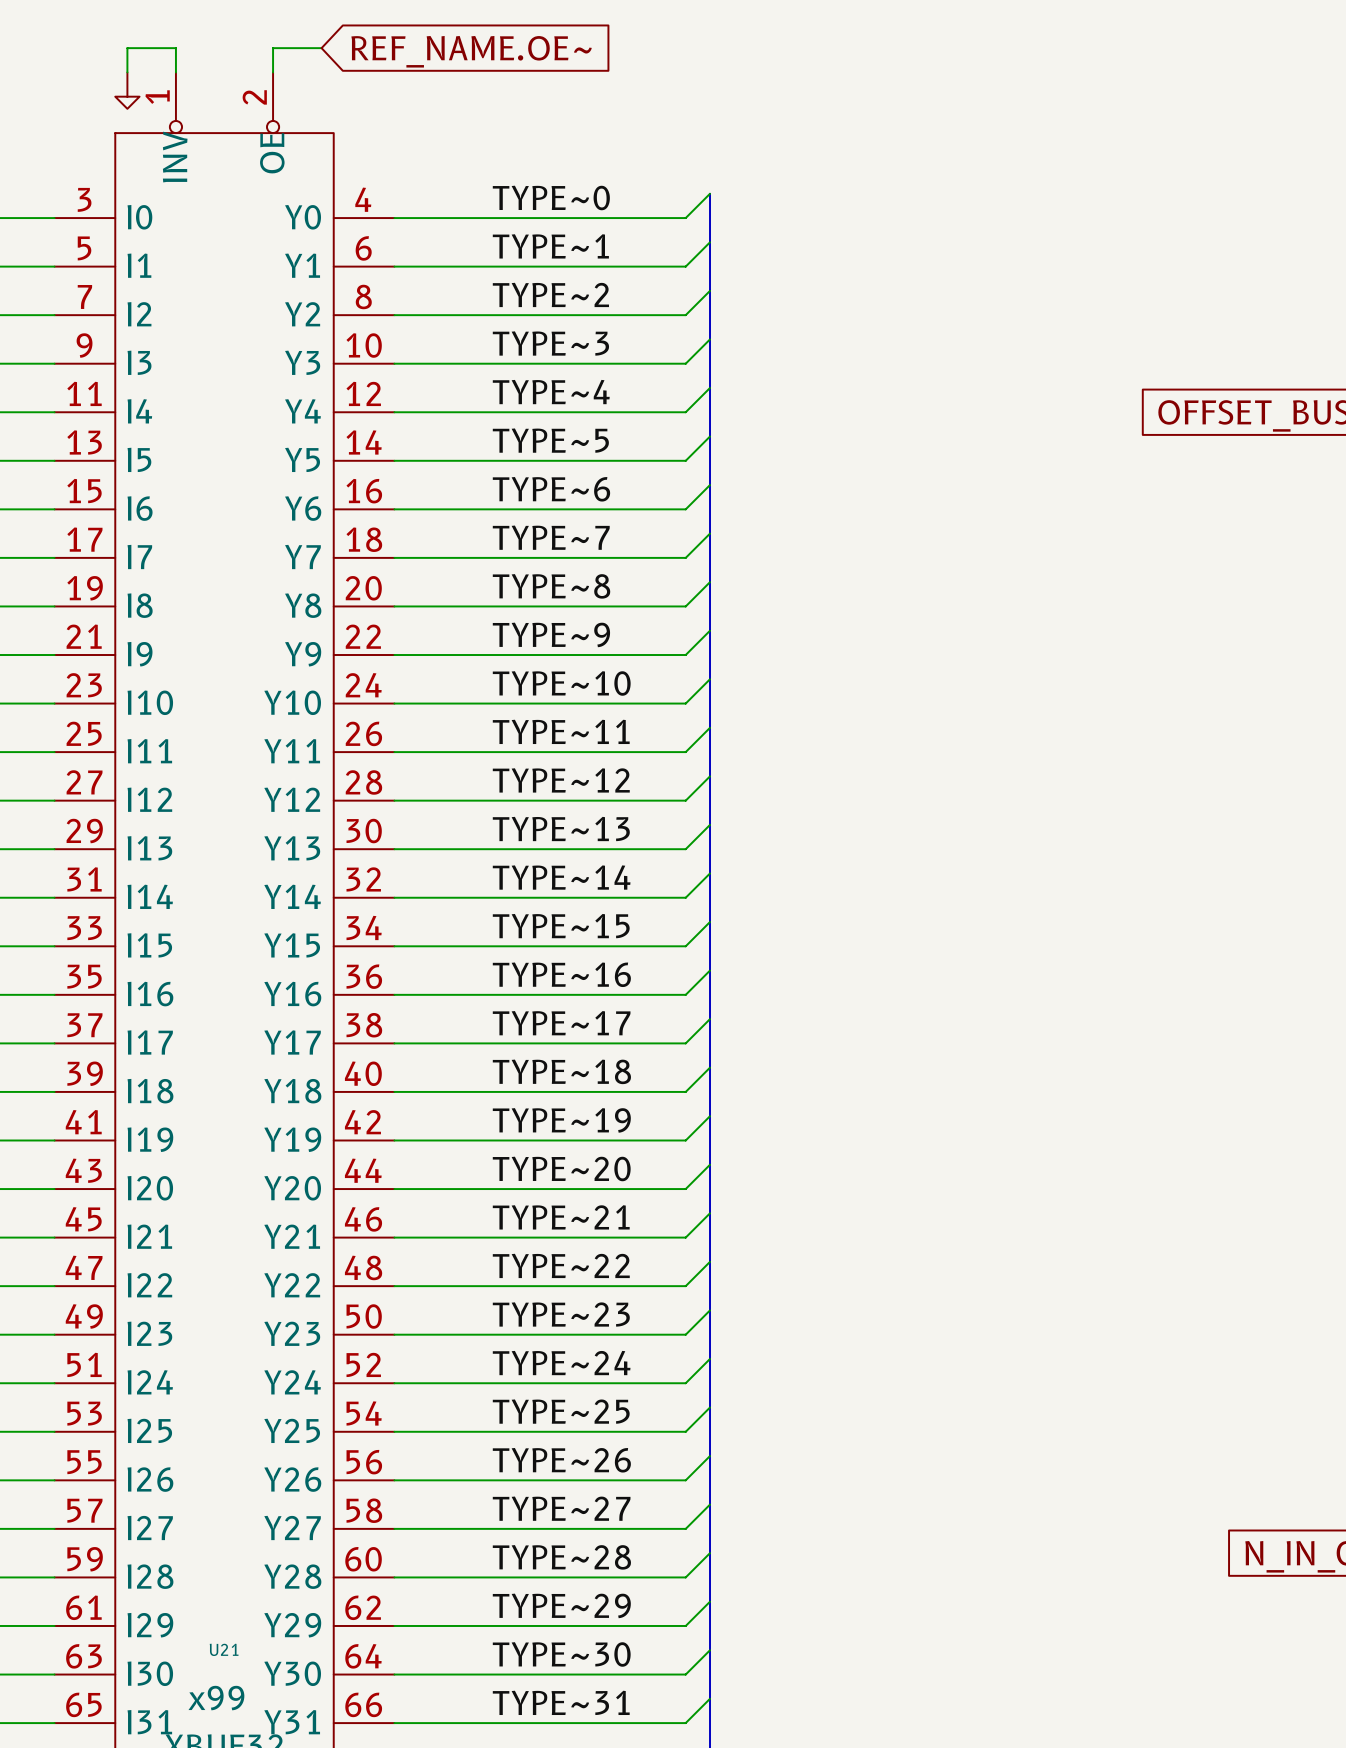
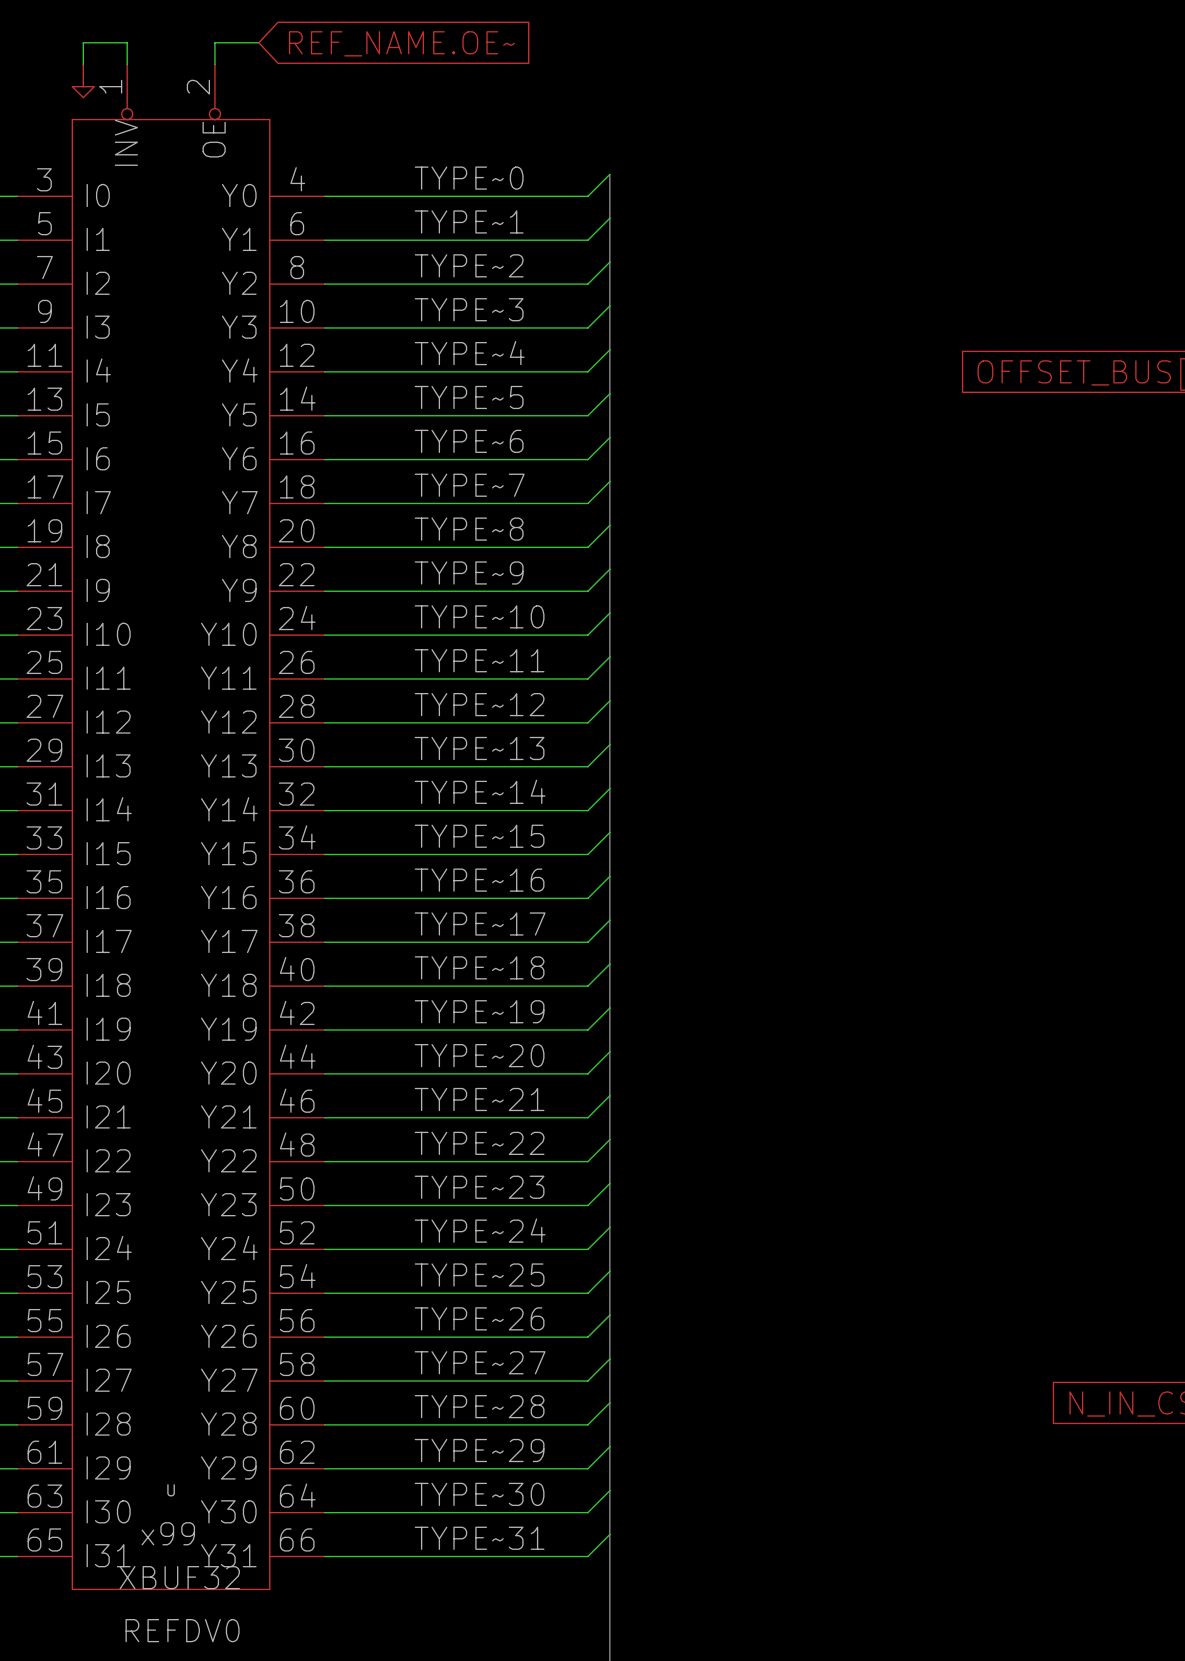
U21 name: U21 (224, 1649) -> U (171, 1490)

